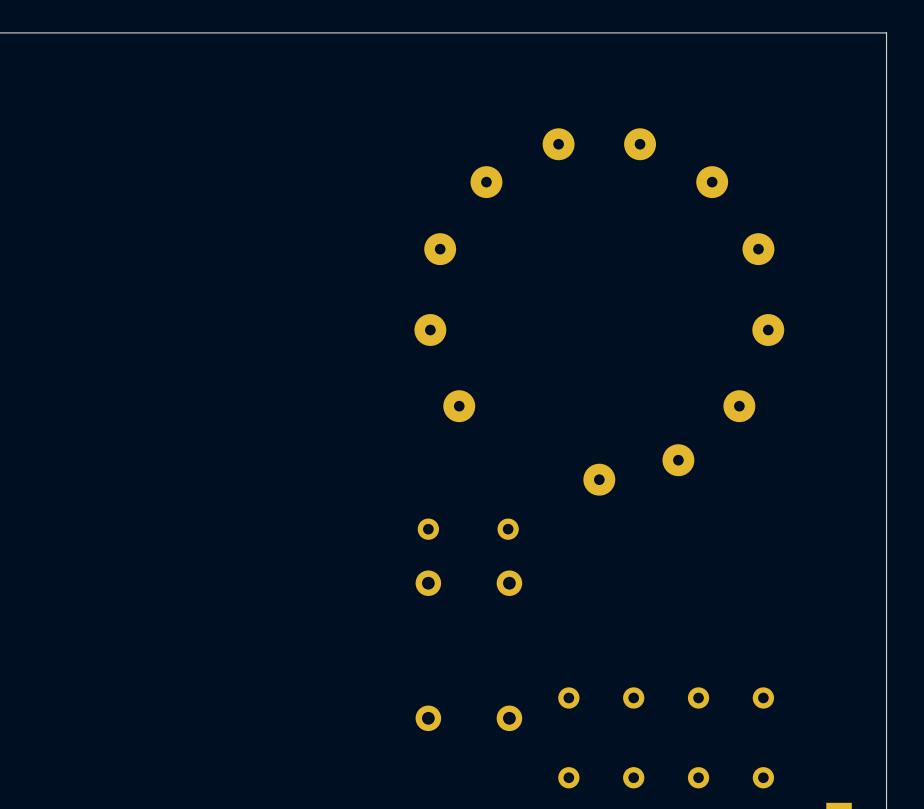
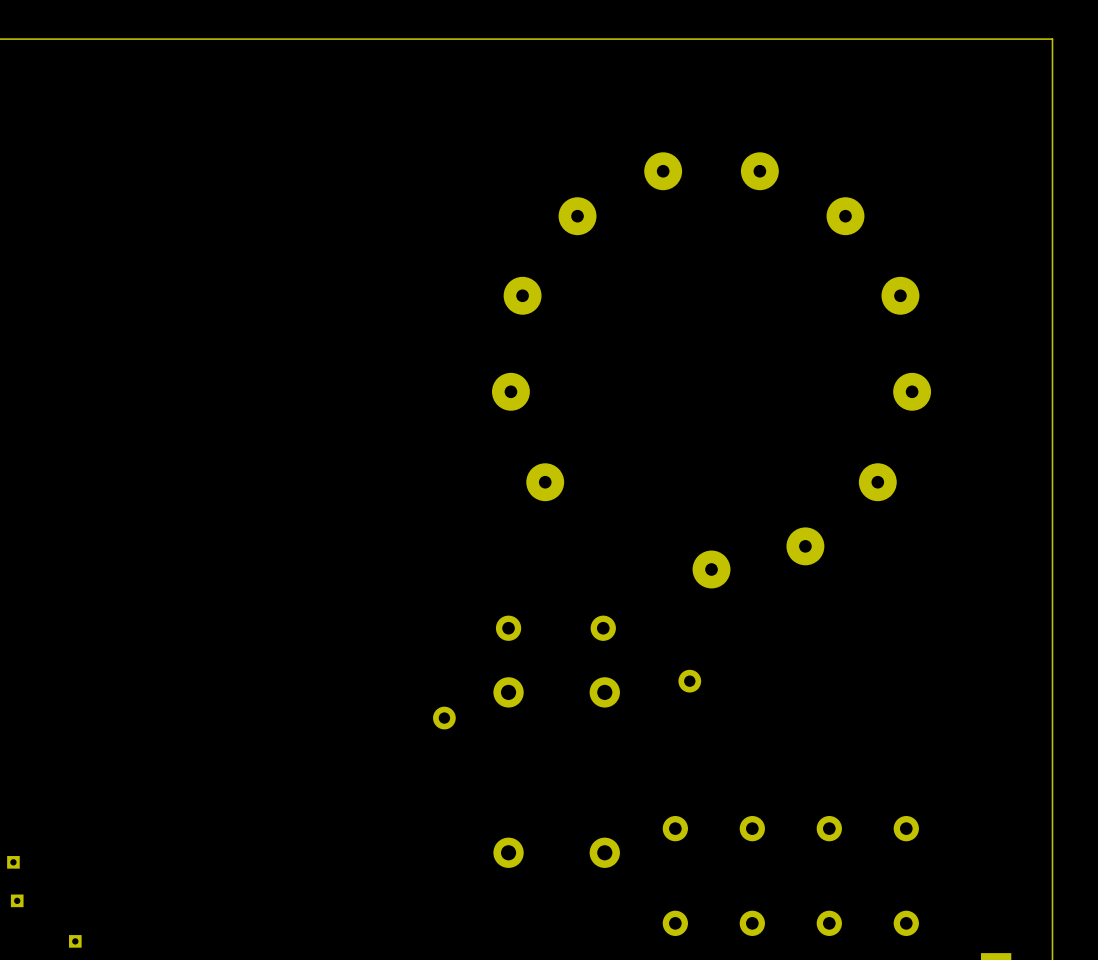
part: none -> (689, 681)
part: none -> (444, 718)
part: none -> (13, 862)
part: none -> (17, 900)
part: none -> (75, 941)

